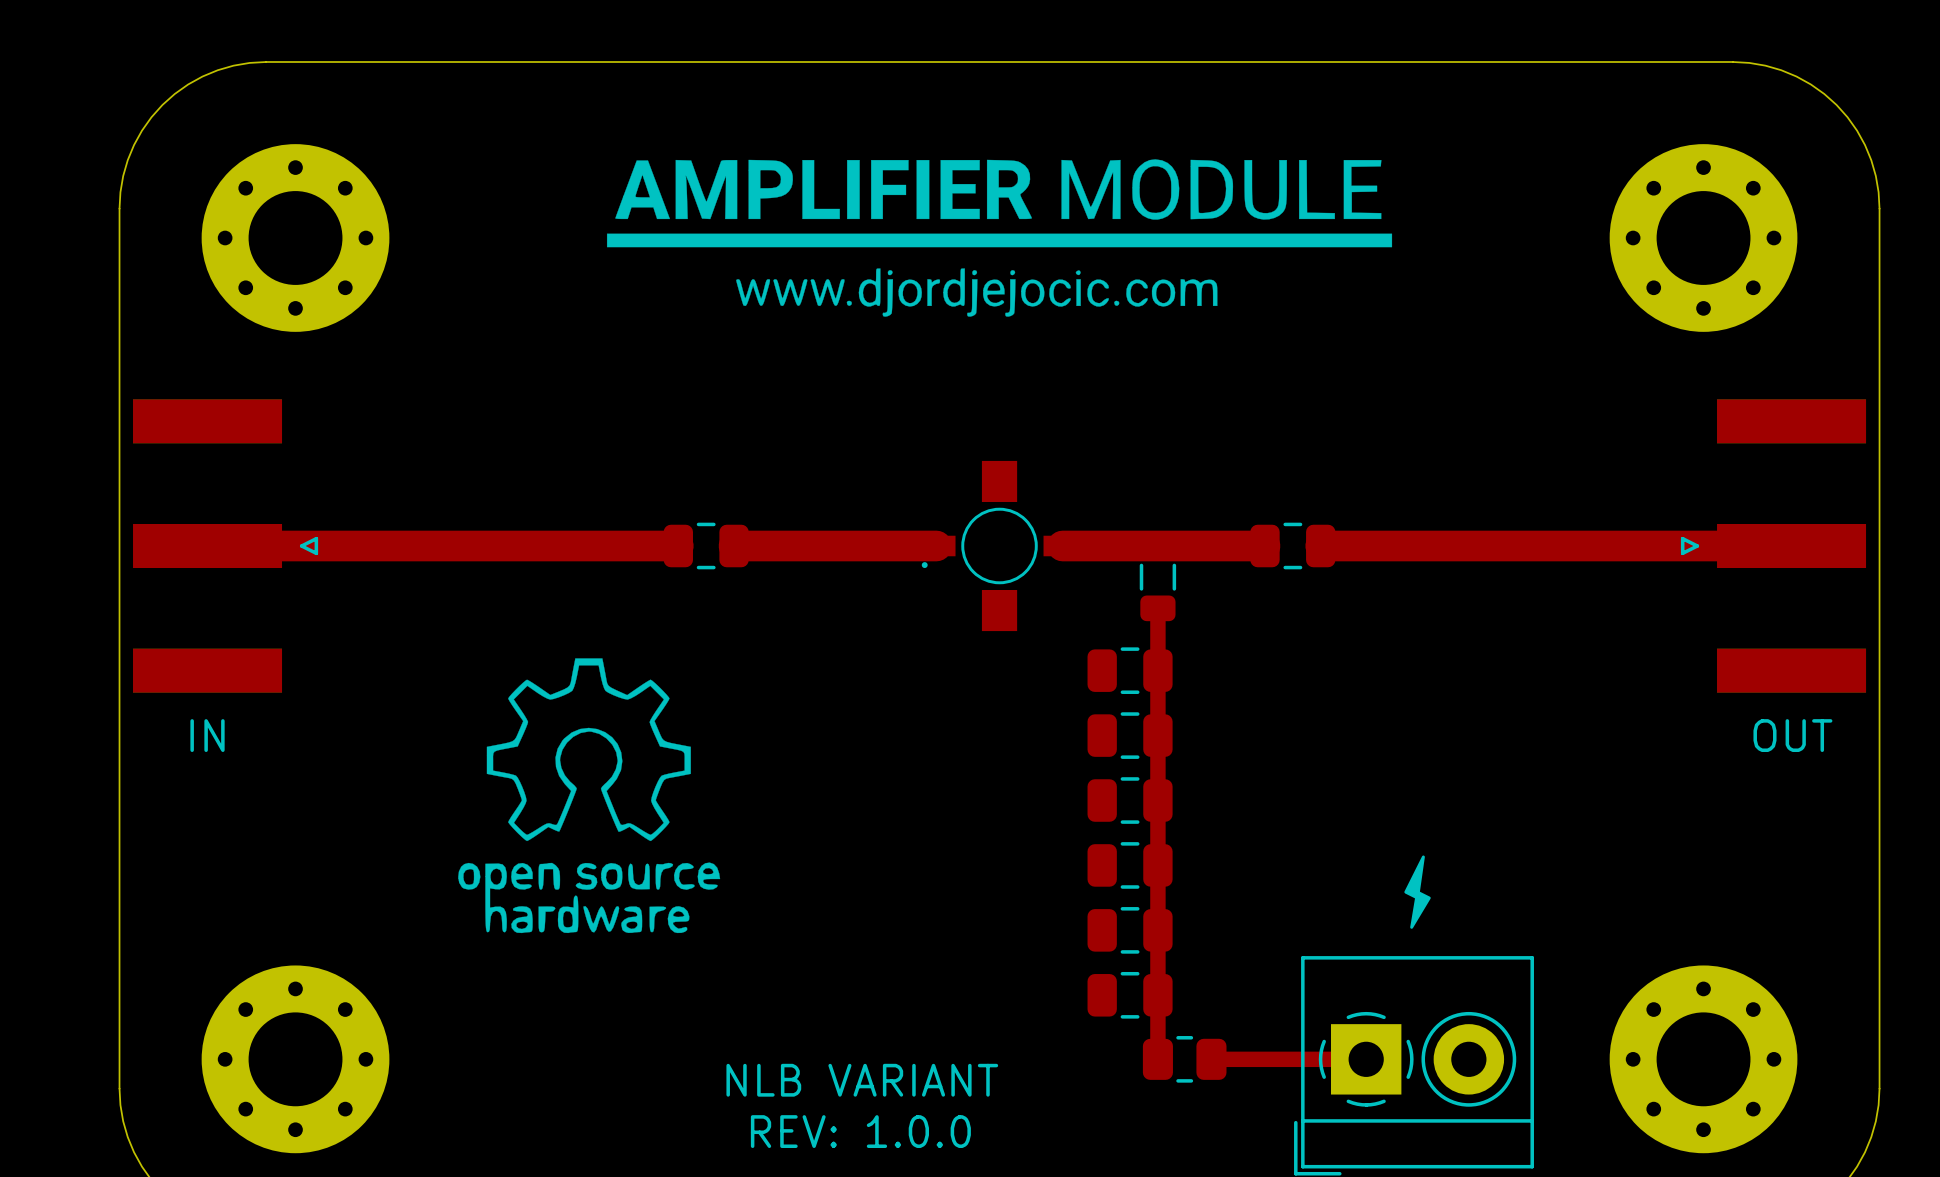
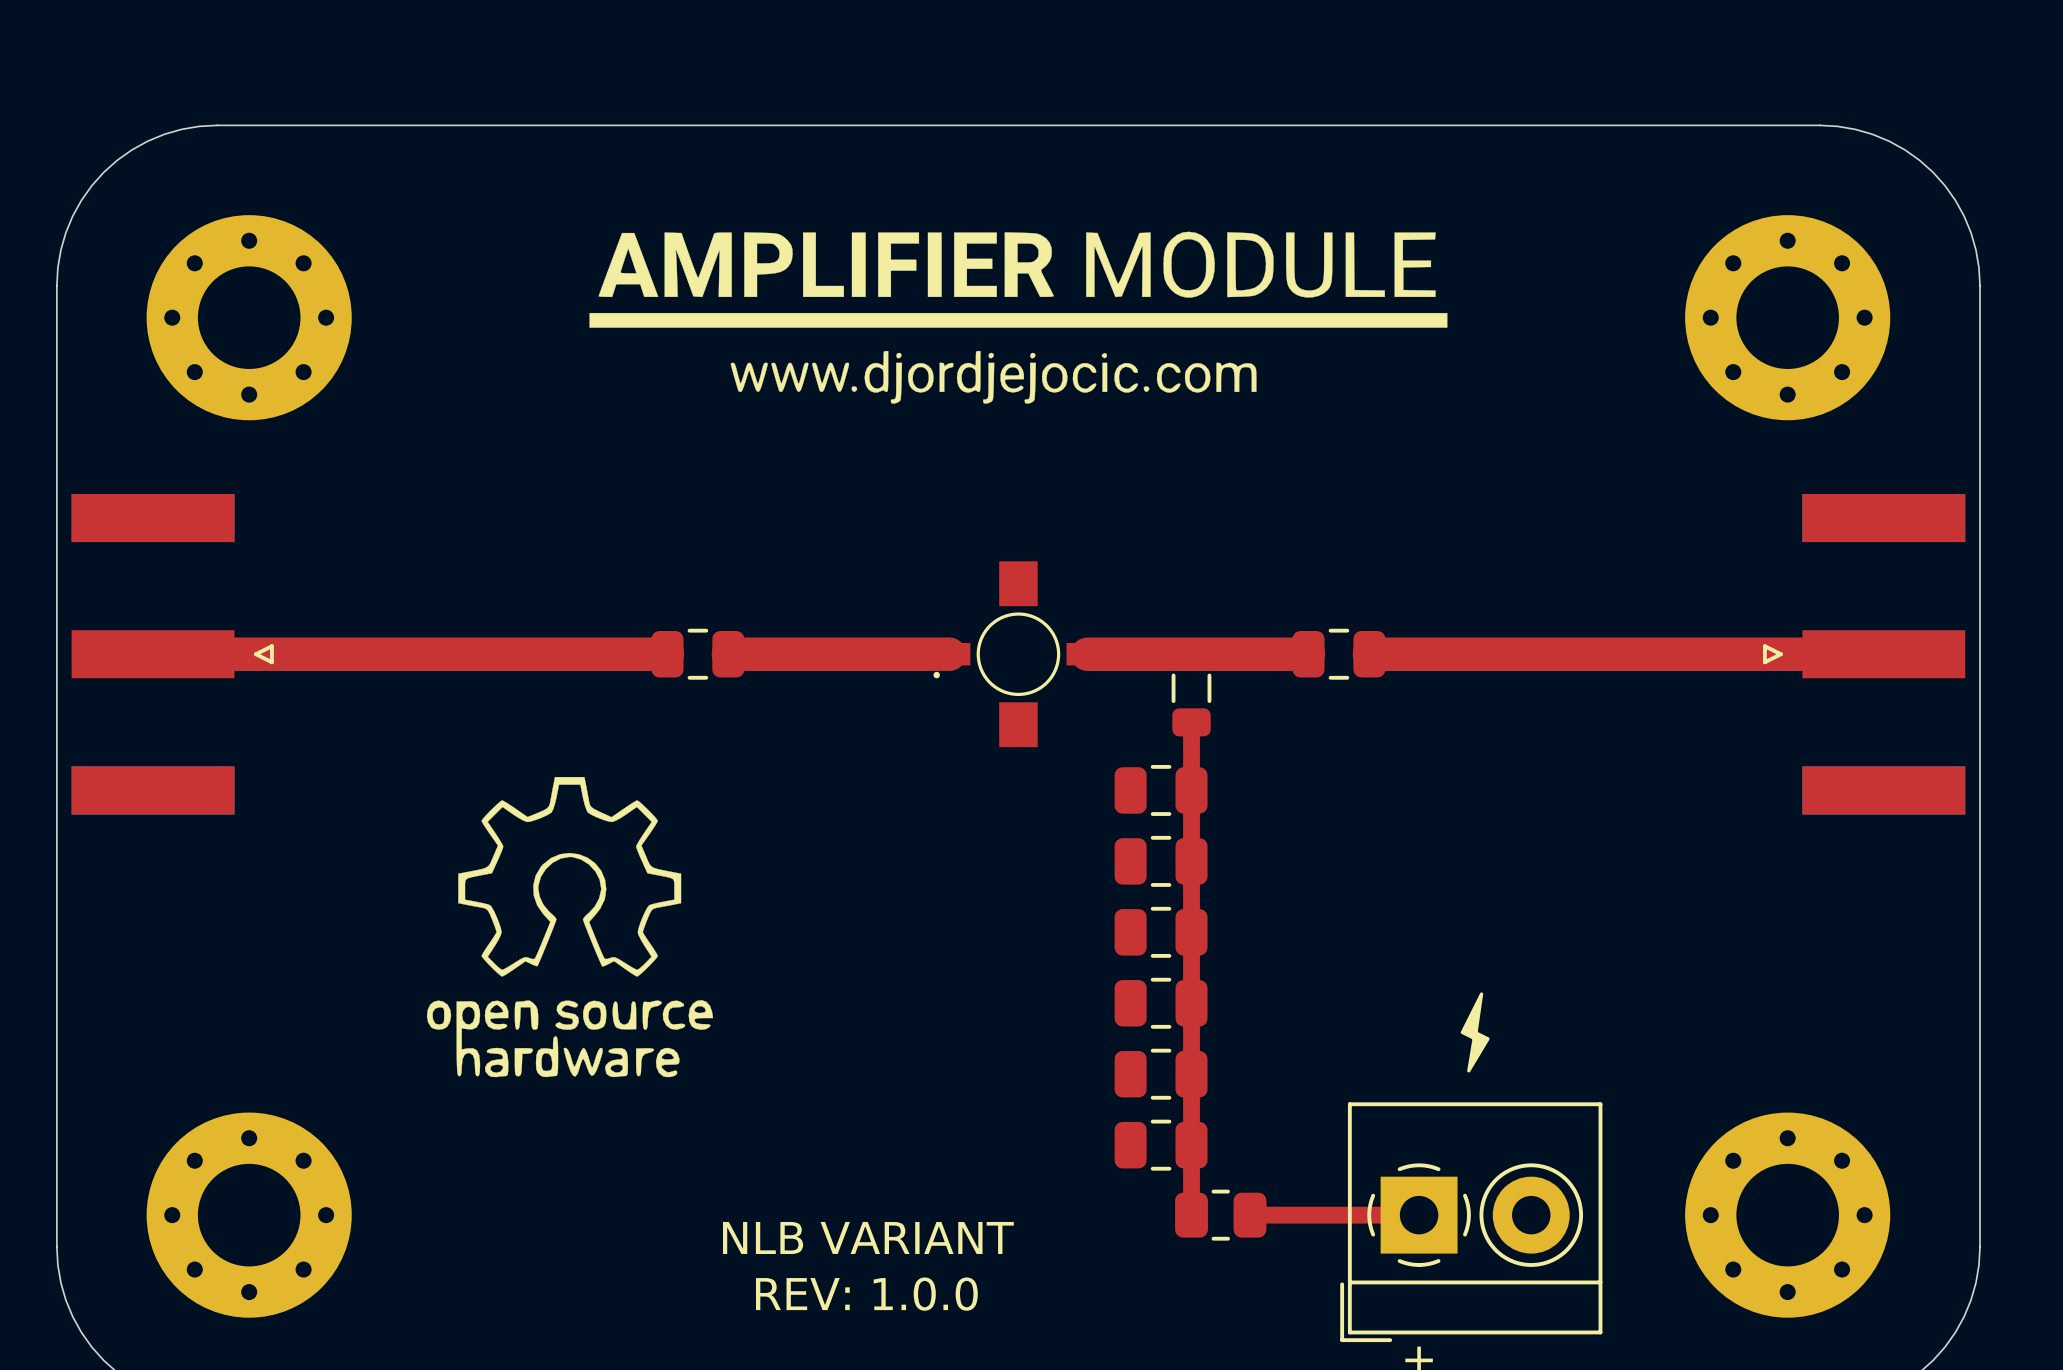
text: IN (207, 735) -> none
text: OUT (1792, 735) -> none

